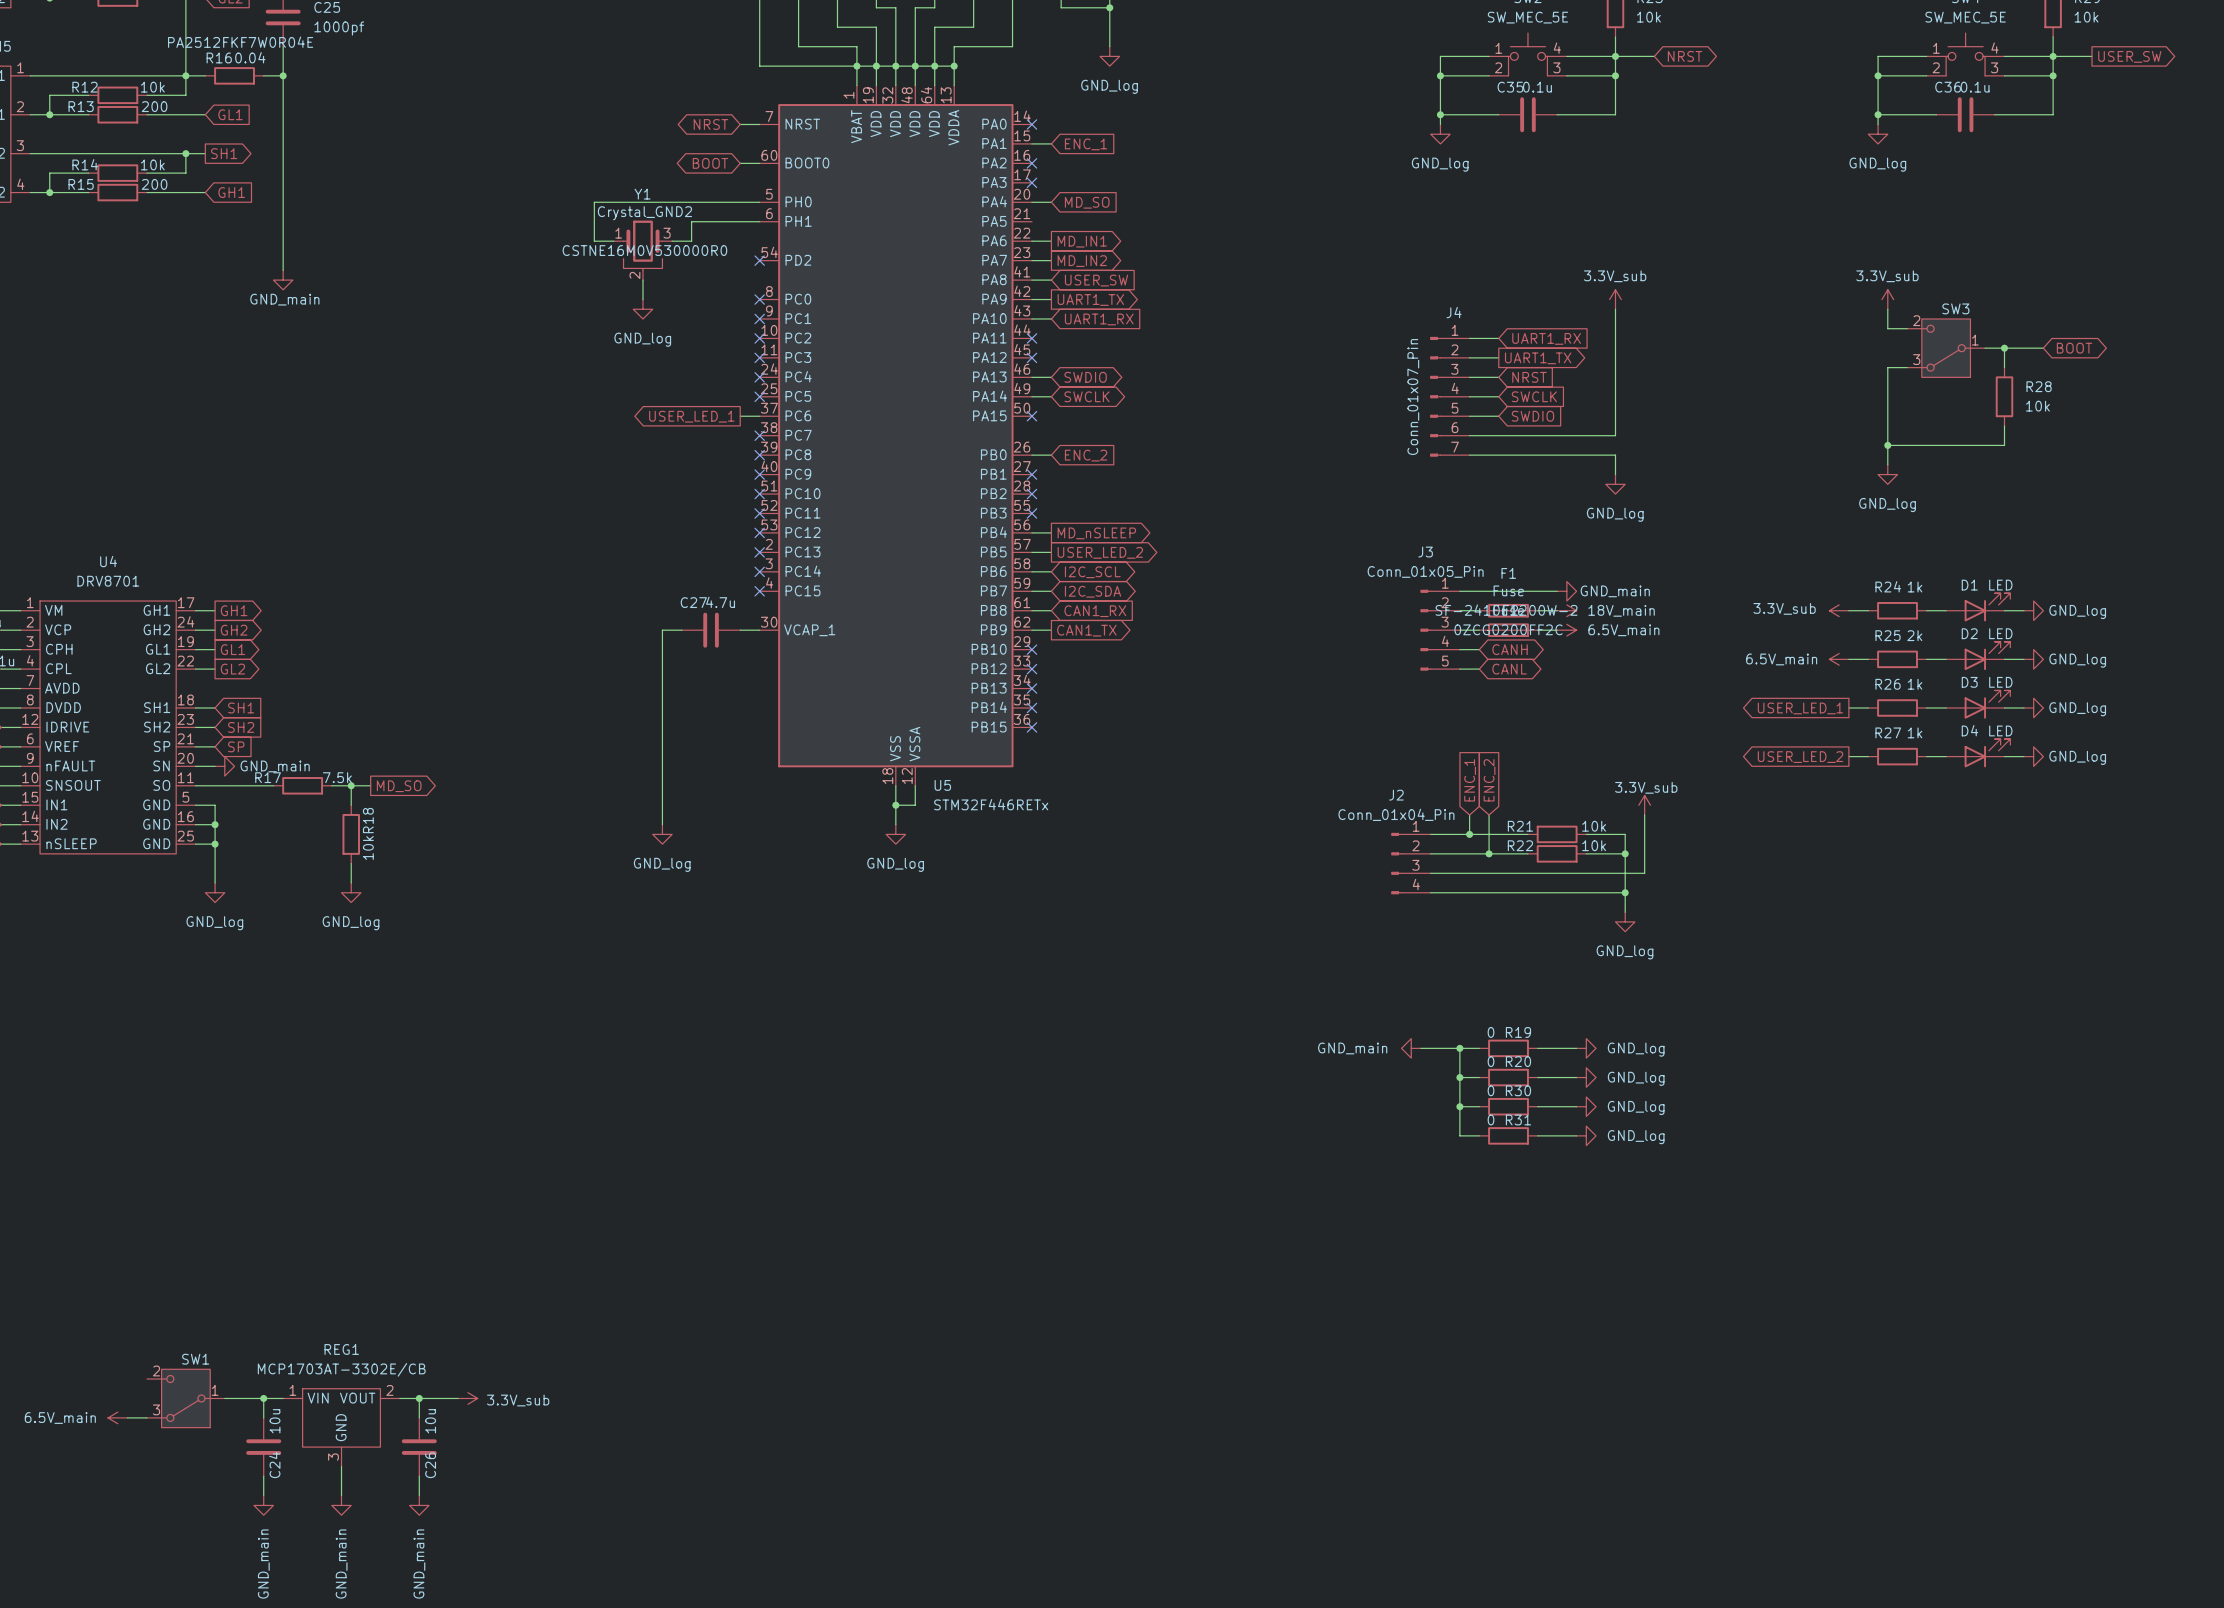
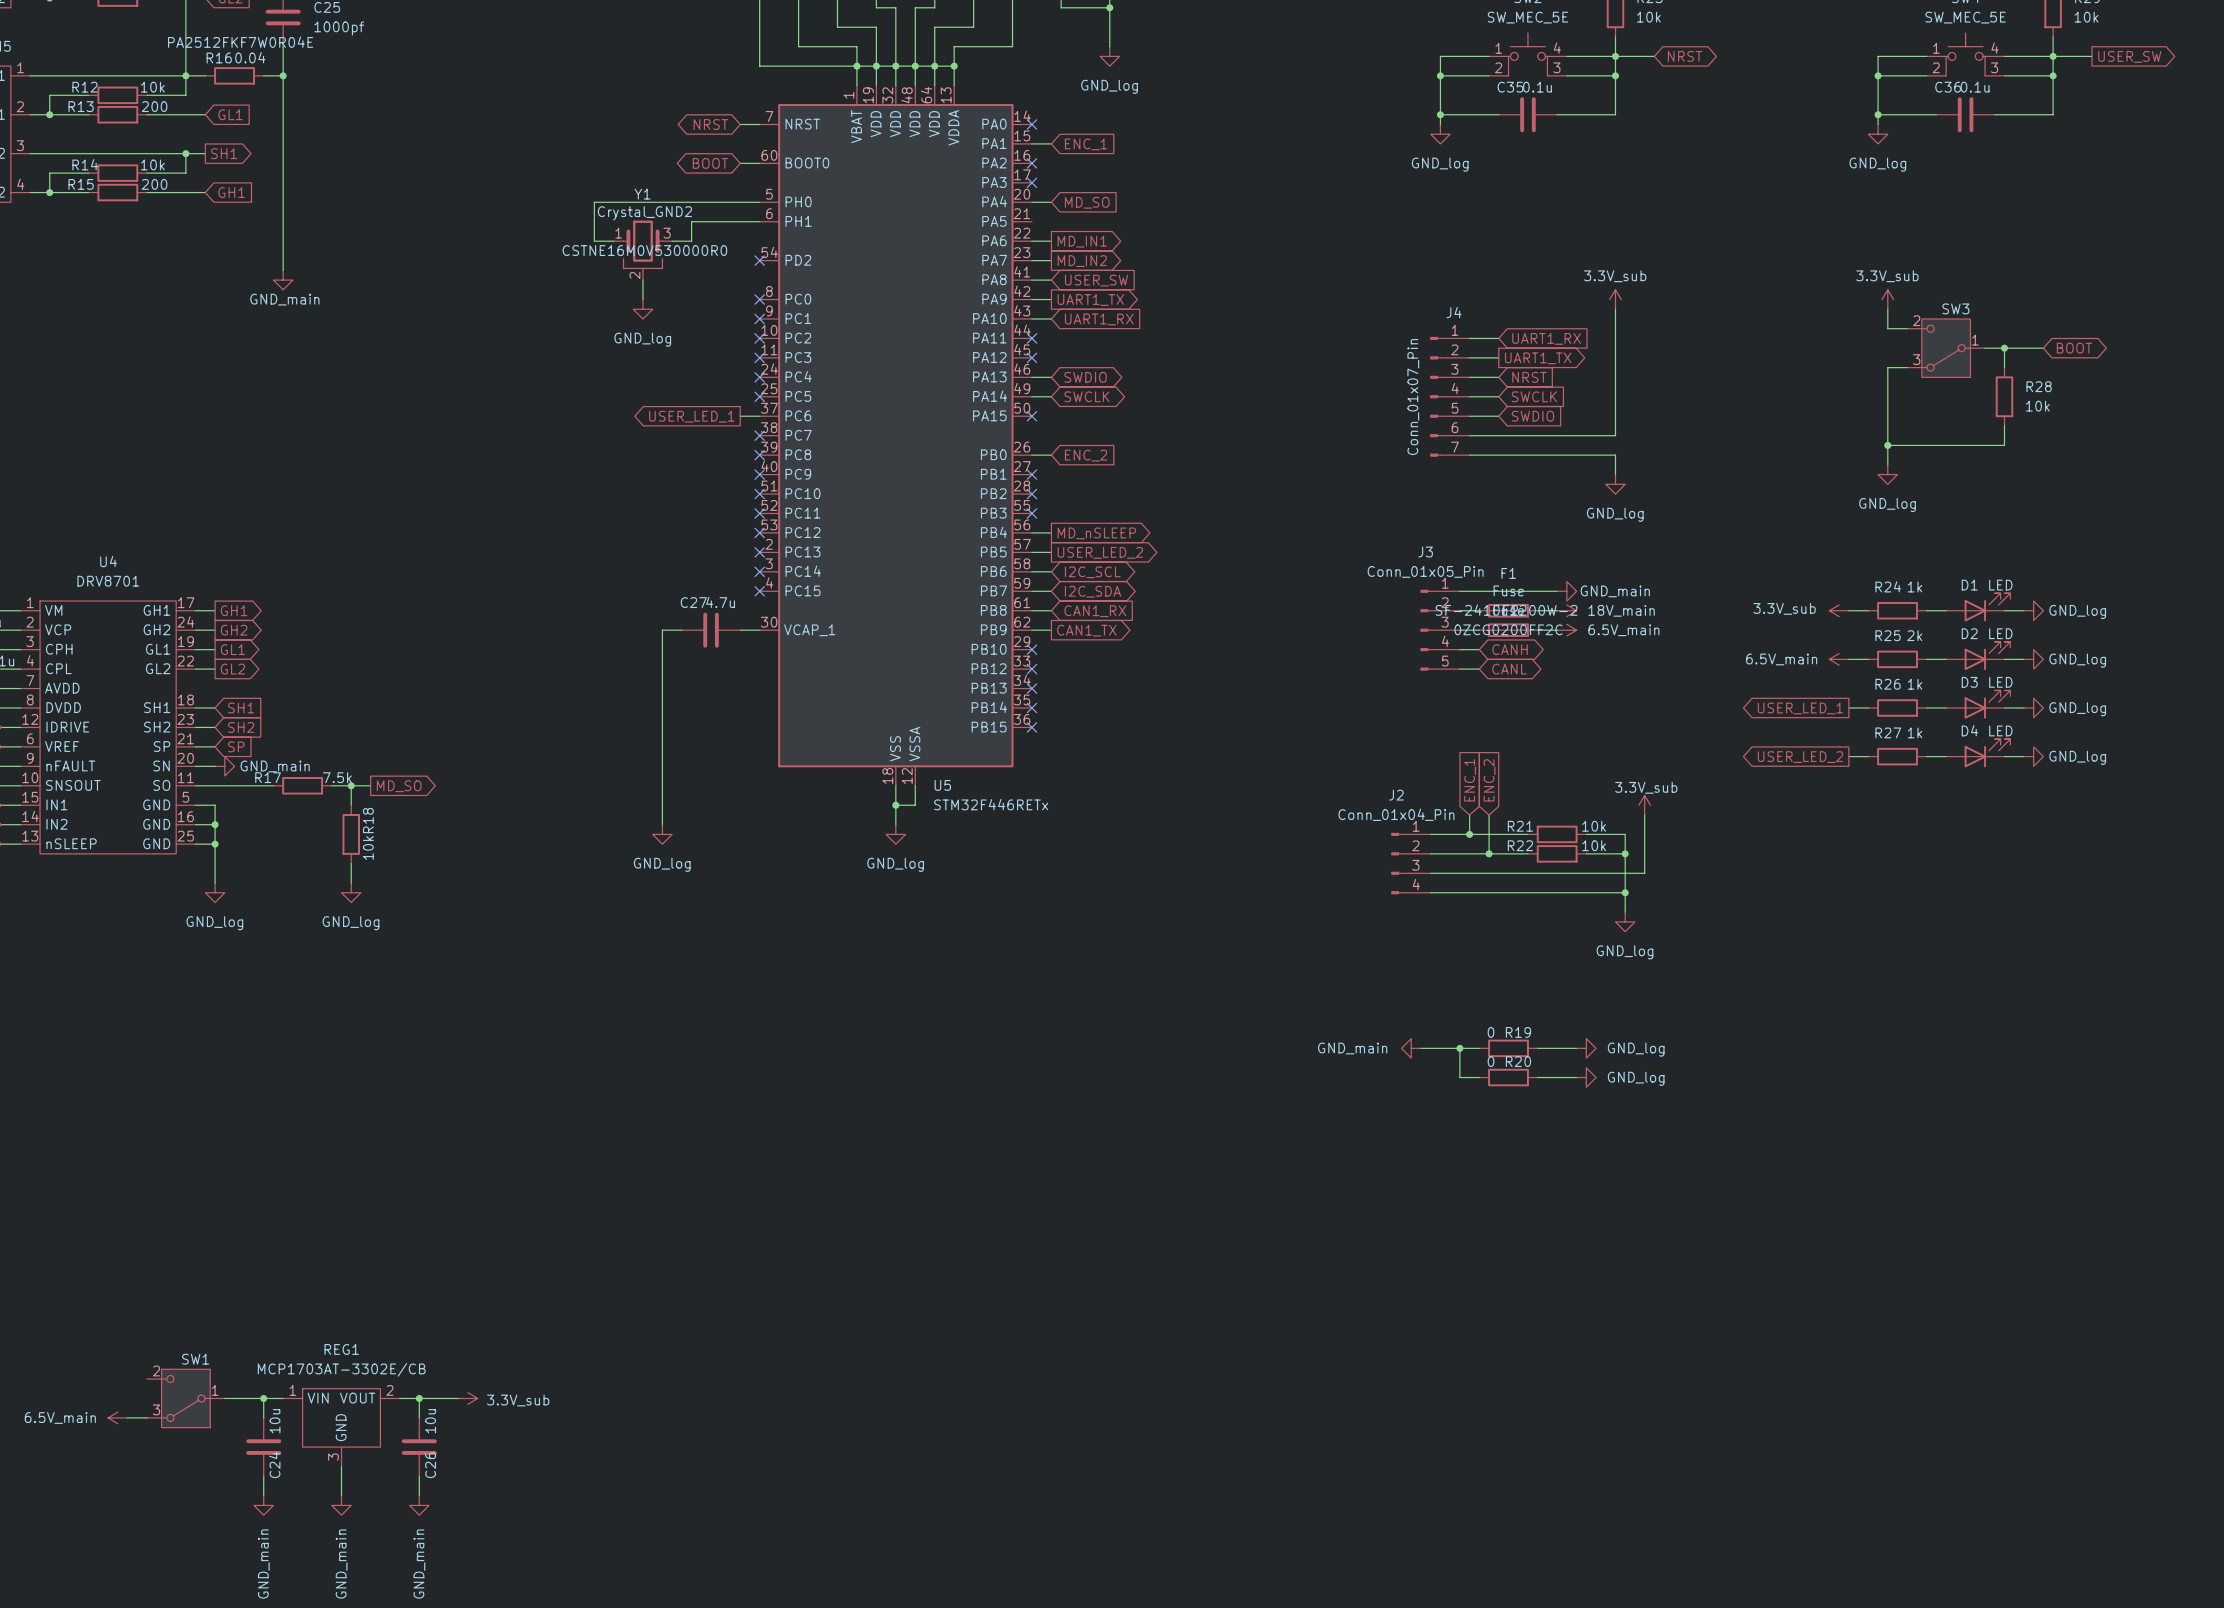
wire: (1459, 1077) (1459, 1135) (1479, 1135) -> none
junction: (1459, 1077) -> none
wire: (1459, 1106) (1479, 1106) -> none
junction: (1459, 1106) -> none
R30: 0 (1508, 1106) -> none
wire: (1537, 1106) (1576, 1106) -> none
power symbol: GND_log (1586, 1106) -> none
R31: 0 (1508, 1135) -> none
wire: (1537, 1135) (1576, 1135) -> none
power symbol: GND_log (1586, 1135) -> none

